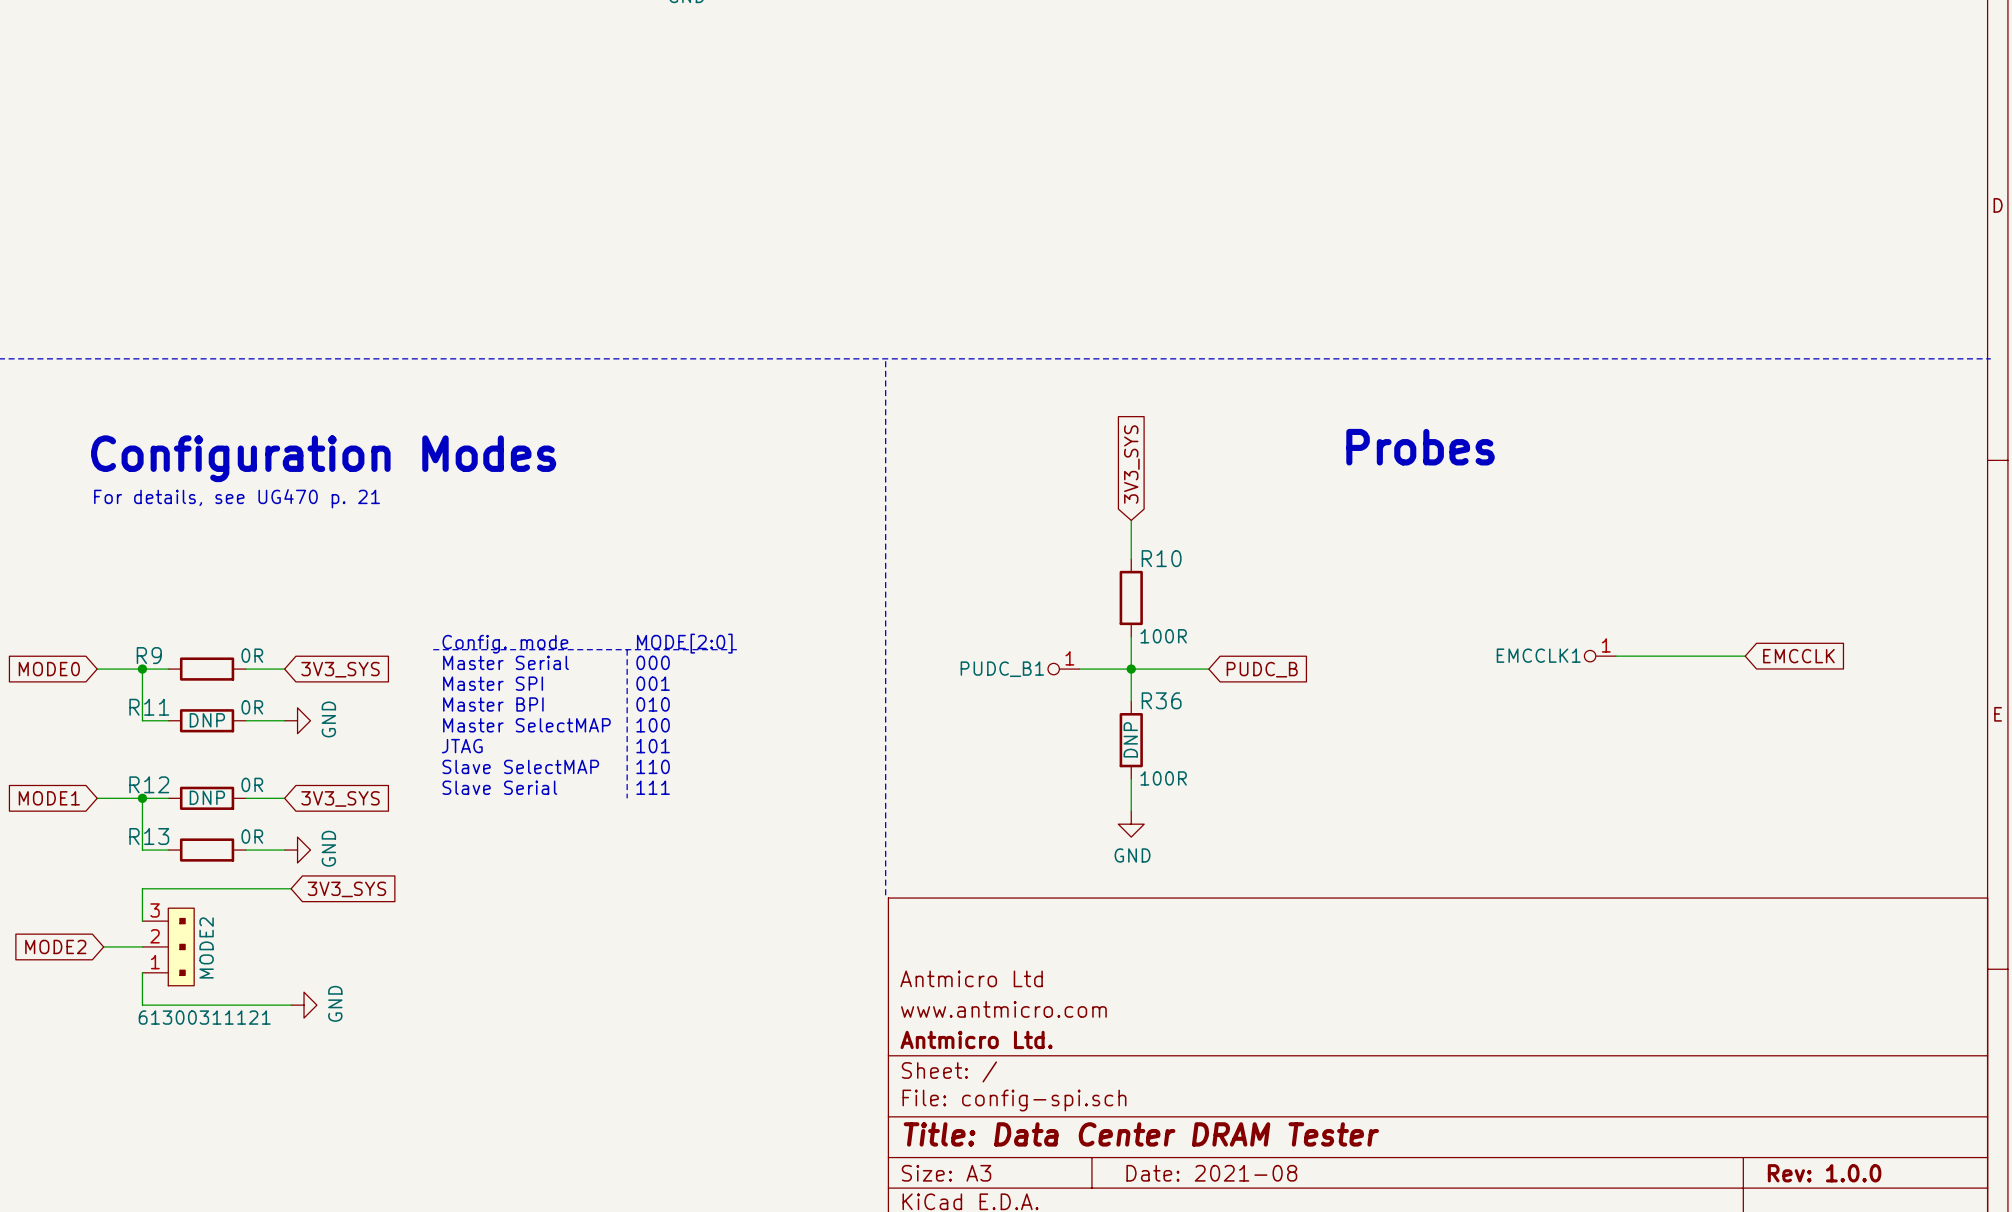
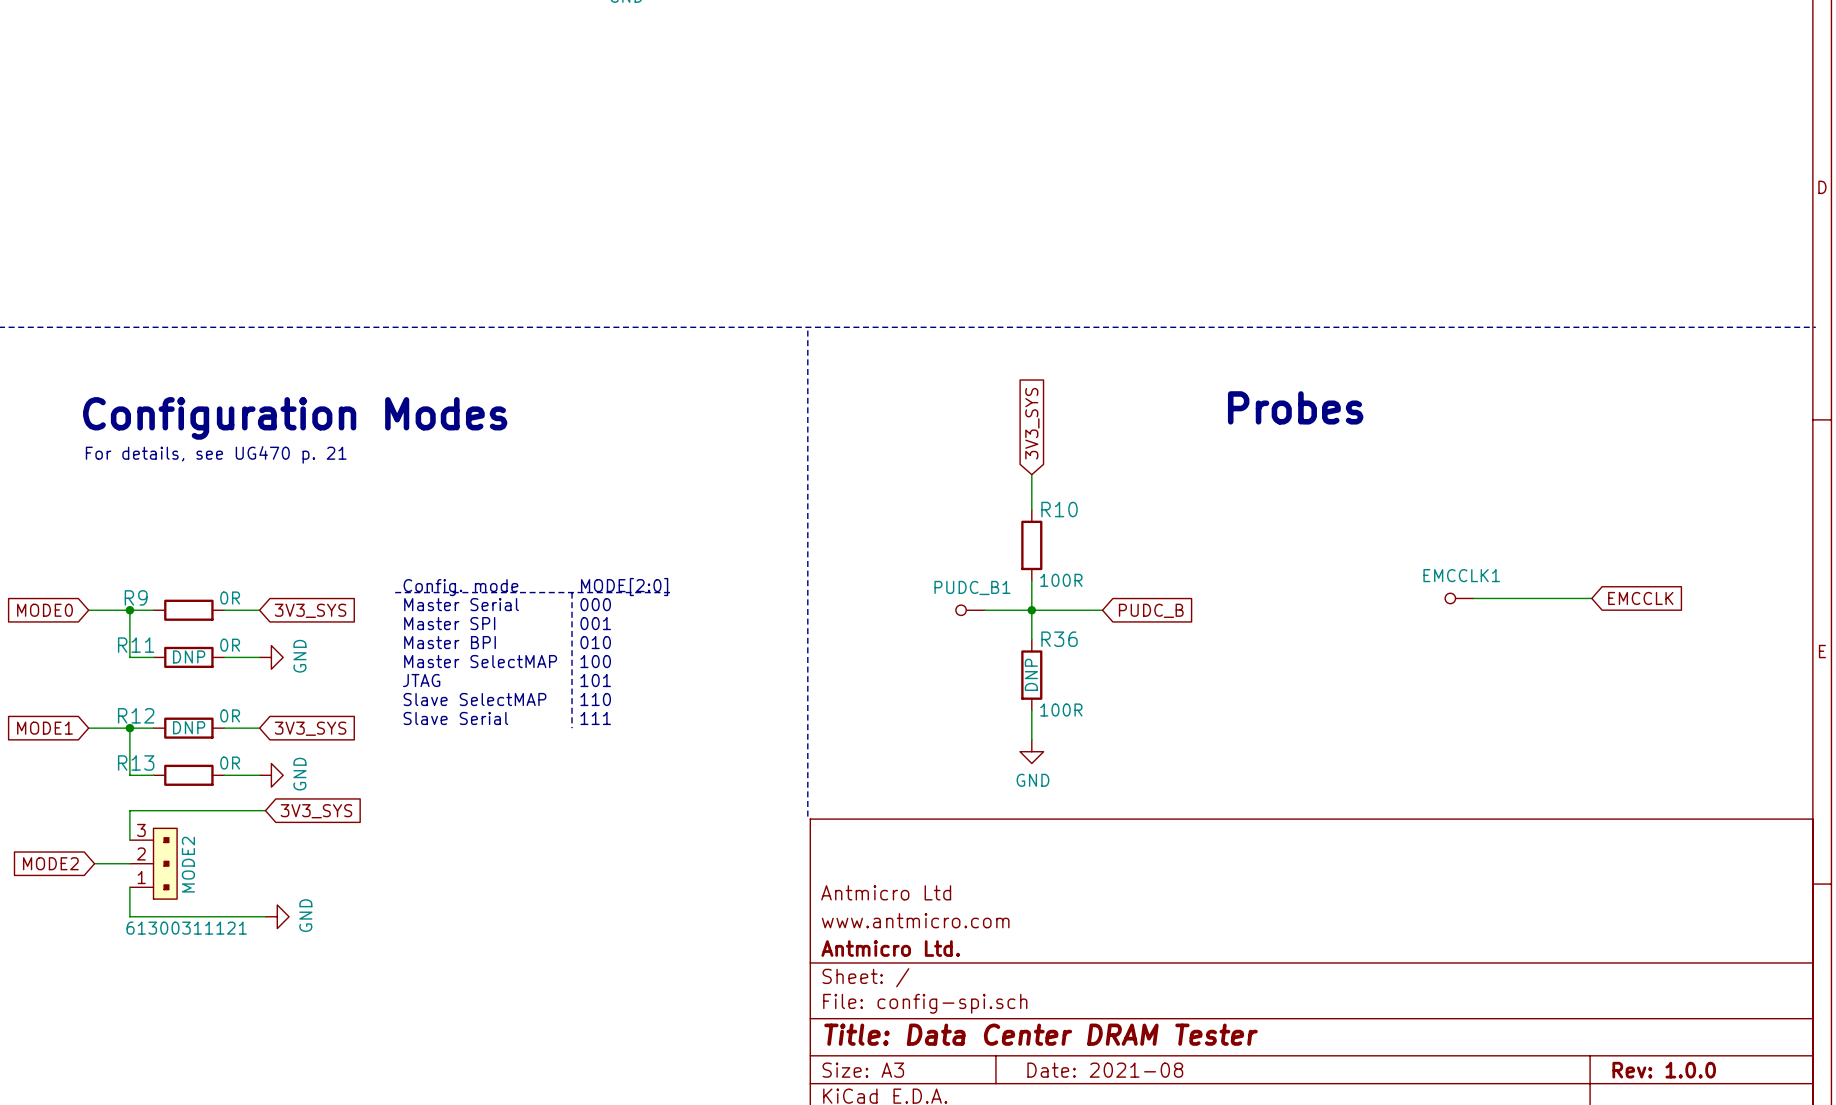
EMCCLK1 pin number: 1 (1606, 645) -> none
EMCCLK1 name position: EMCCLK1 (1538, 655) -> EMCCLK1 (1461, 575)
PUDC_B1 pin number: 1 (1069, 658) -> none
PUDC_B1 name position: PUDC_B1 (1002, 669) -> PUDC_B1 (972, 587)

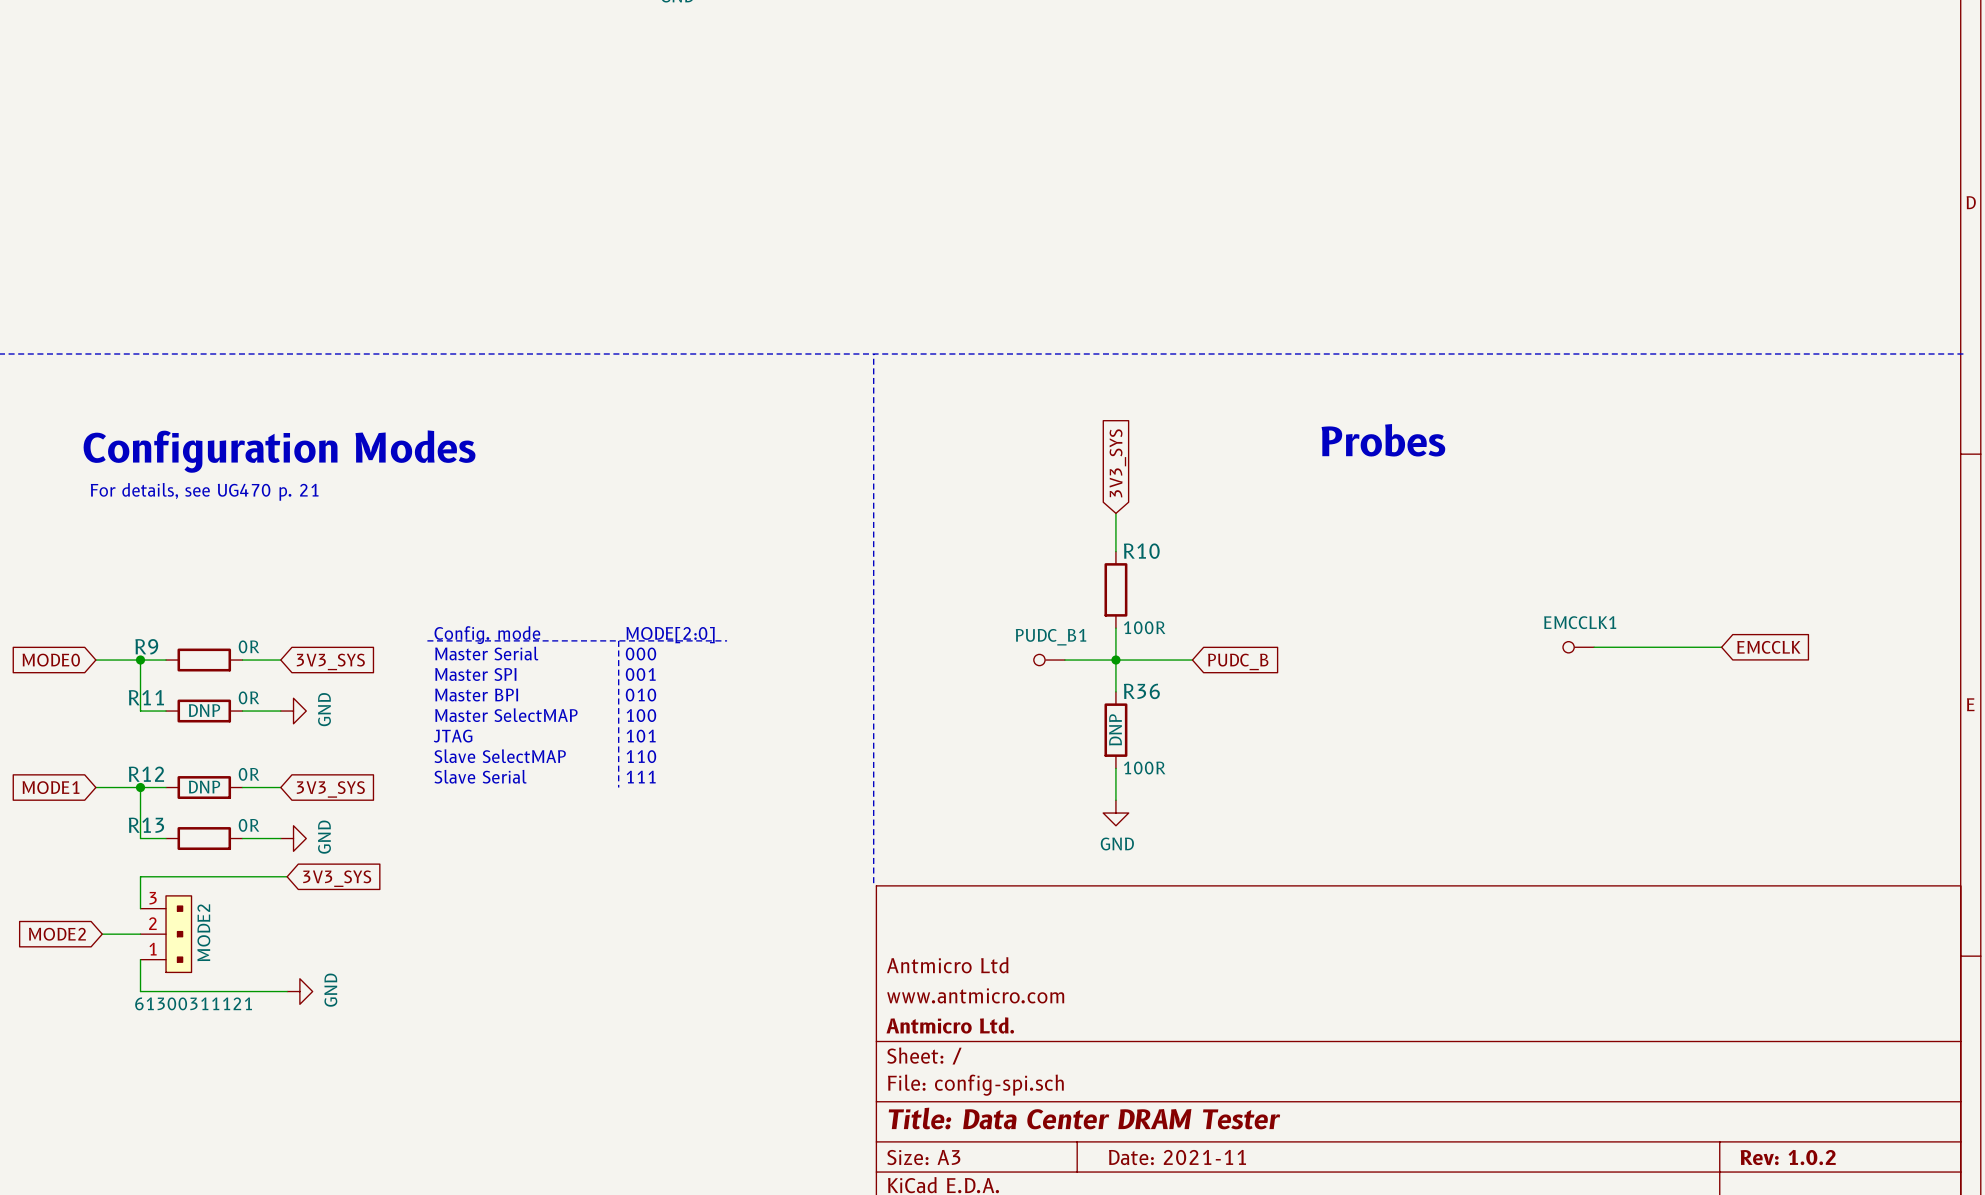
title block: Date: 2021-08 (1105, 1070) -> Date: 2021-11 (1177, 1157)
title block: Rev: 1.0.0 (1664, 1070) -> Rev: 1.0.2 (1788, 1157)

